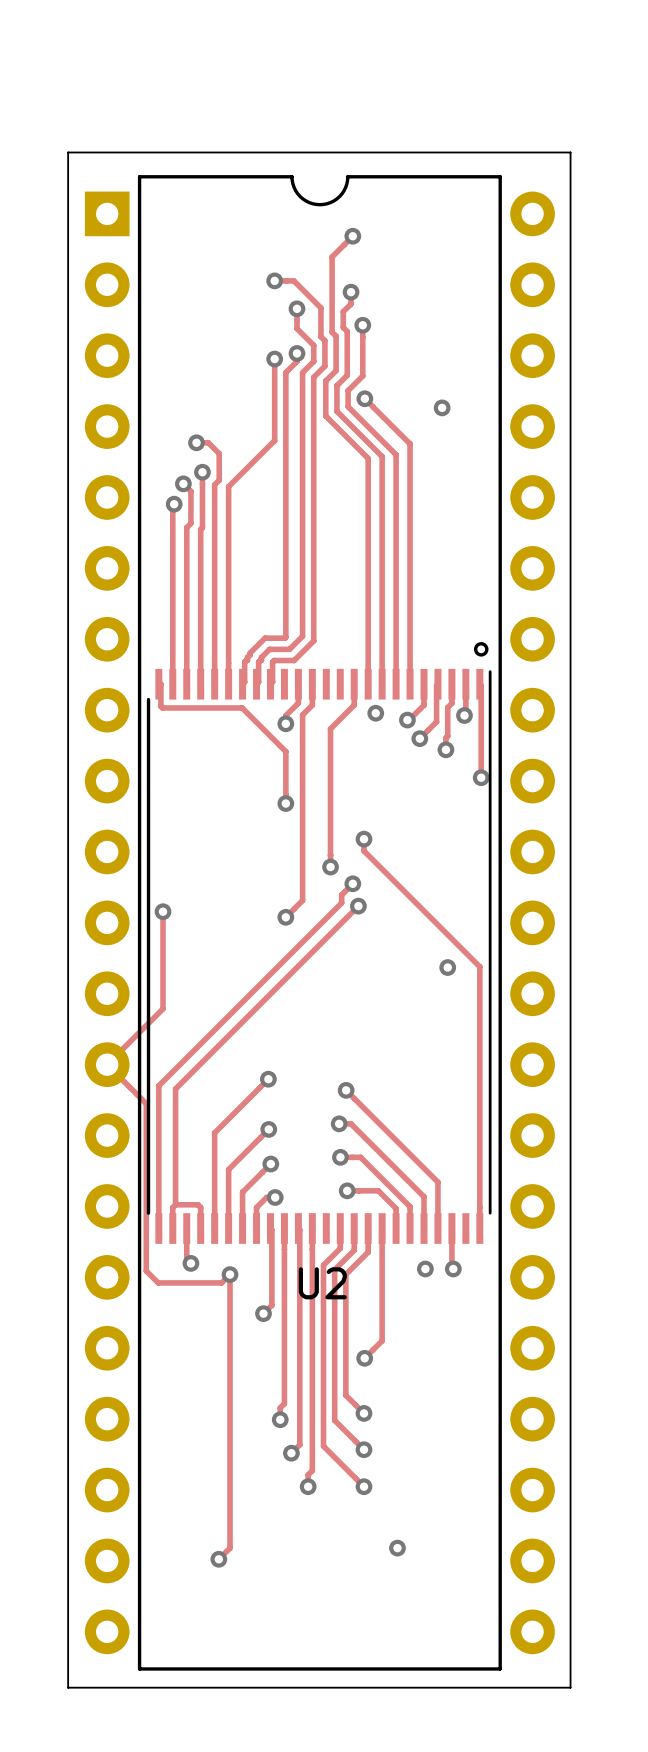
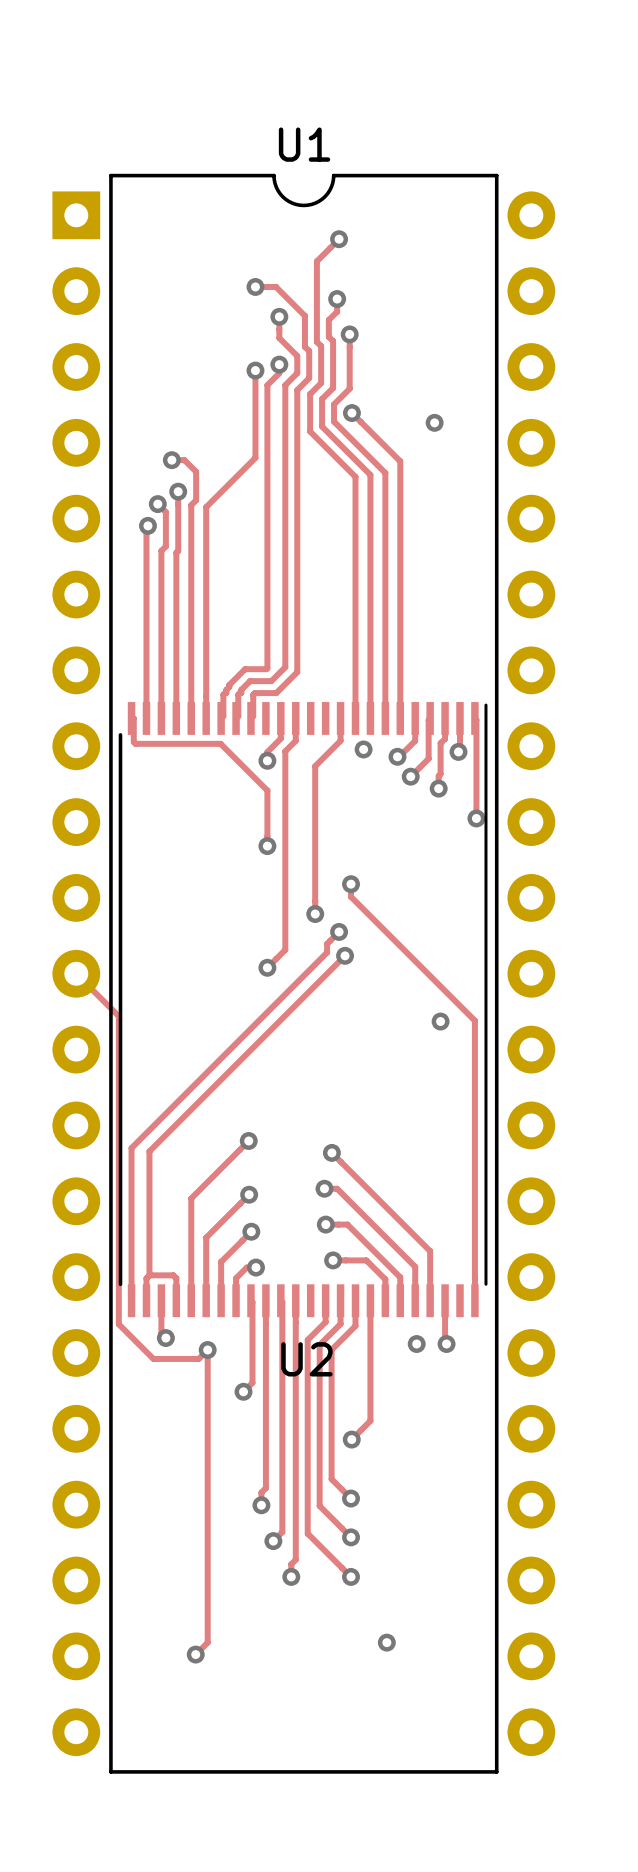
U1 name: none -> U1 (304, 144)
board edge: (68, 152) (68, 1687) (570, 1687) (570, 152) (68, 152) -> none
drawing: [473, 642, 489, 657] -> none
track: (163, 911) (163, 1008) (107, 1064) (146, 1103) (146, 1271) (158, 1282) (179, 1282) -> (76, 973) (118, 1016) (118, 1324) (153, 1358)
via: (163, 911) -> none

